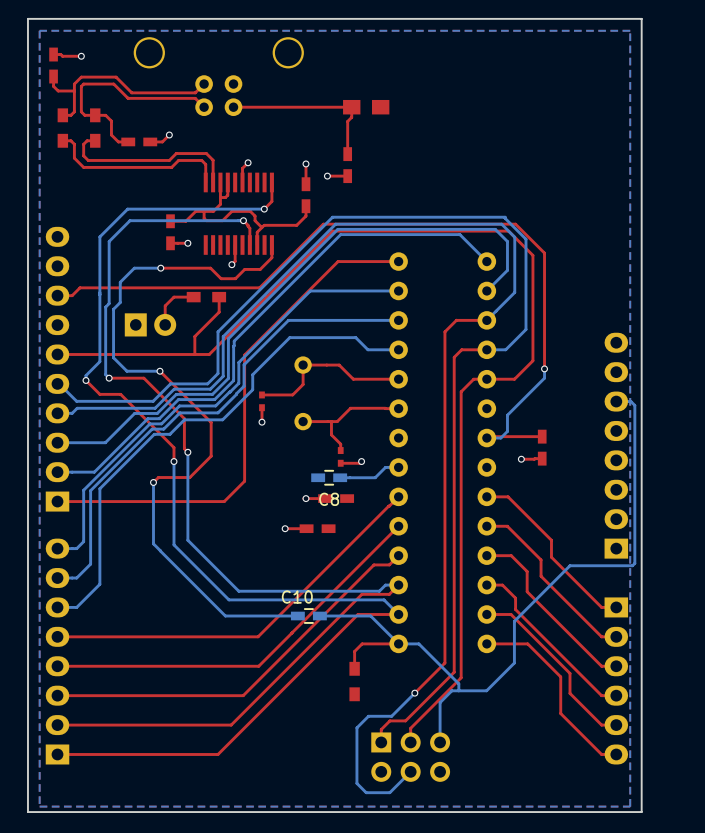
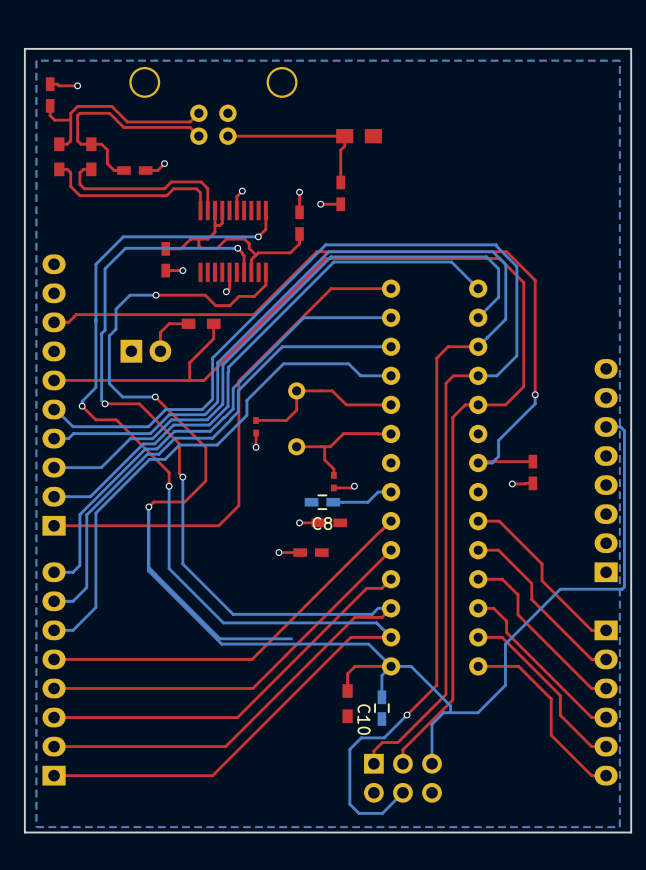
C10 name position: C10 (297, 597) -> C10 (364, 719)
C10 rotation: 0° (308, 616) -> 90° clockwise (381, 708)
C10 position: (308, 616) -> (381, 708)
bottom track: (319, 616) (370, 616) (376, 621) -> (148, 506) (148, 570) (221, 644) (368, 644)
bottom track: none -> (391, 666) (381, 675) (381, 697)

